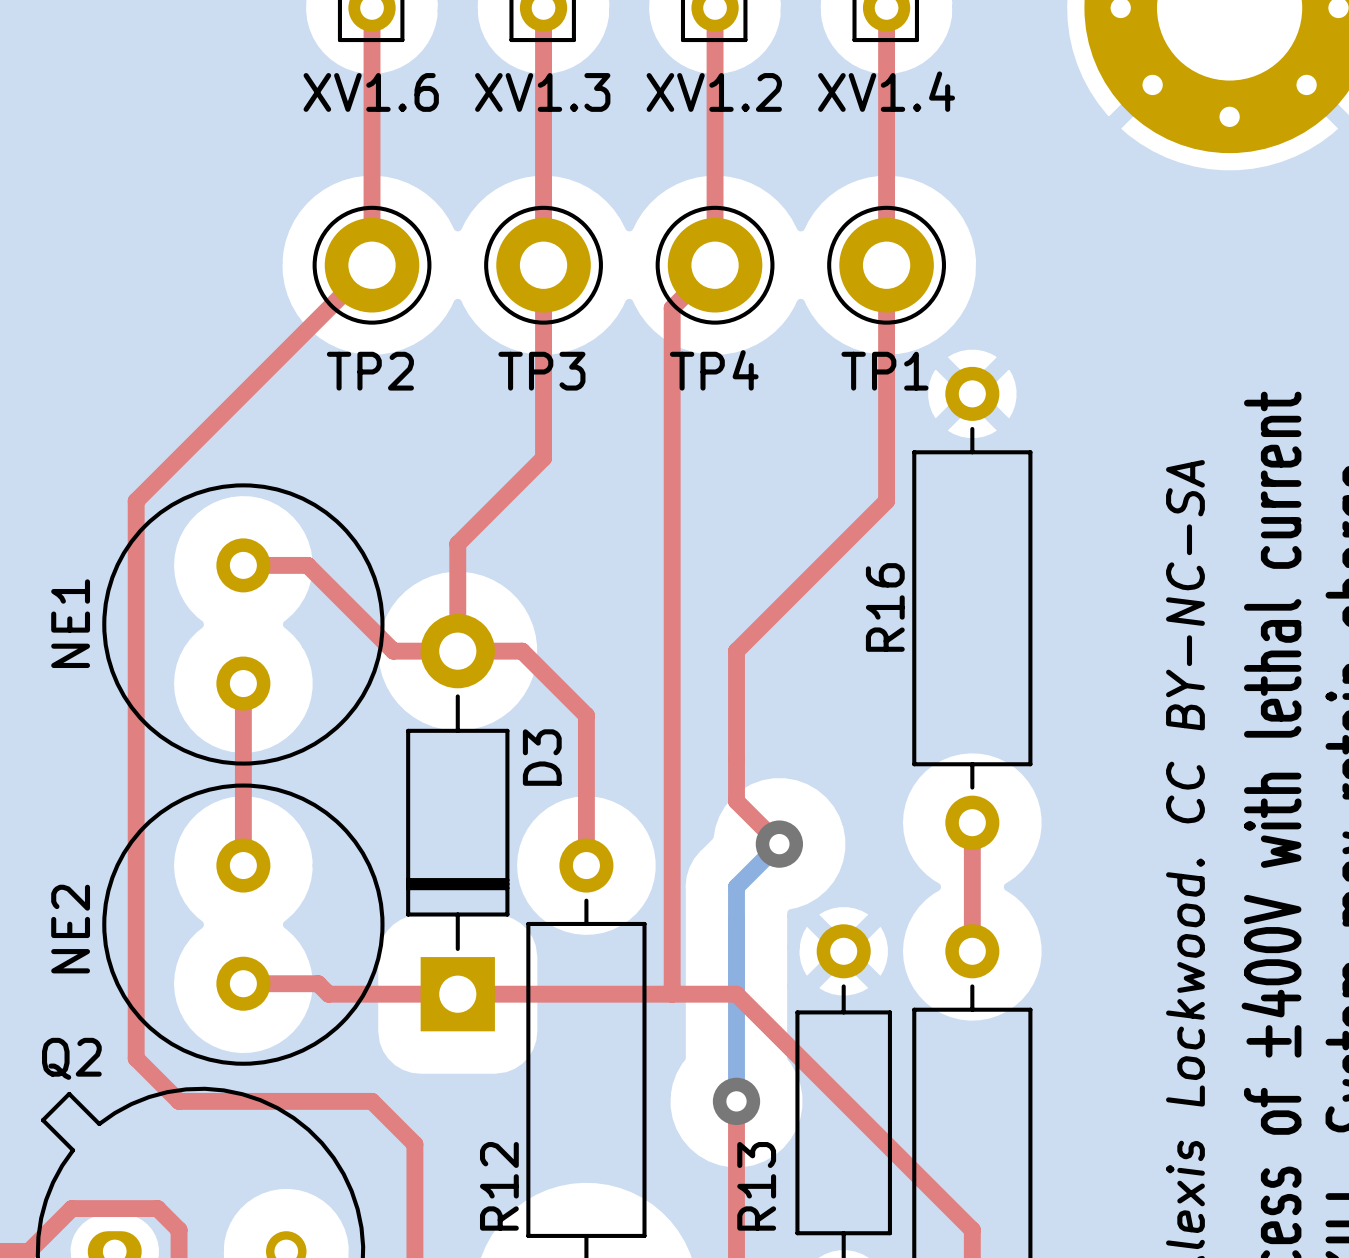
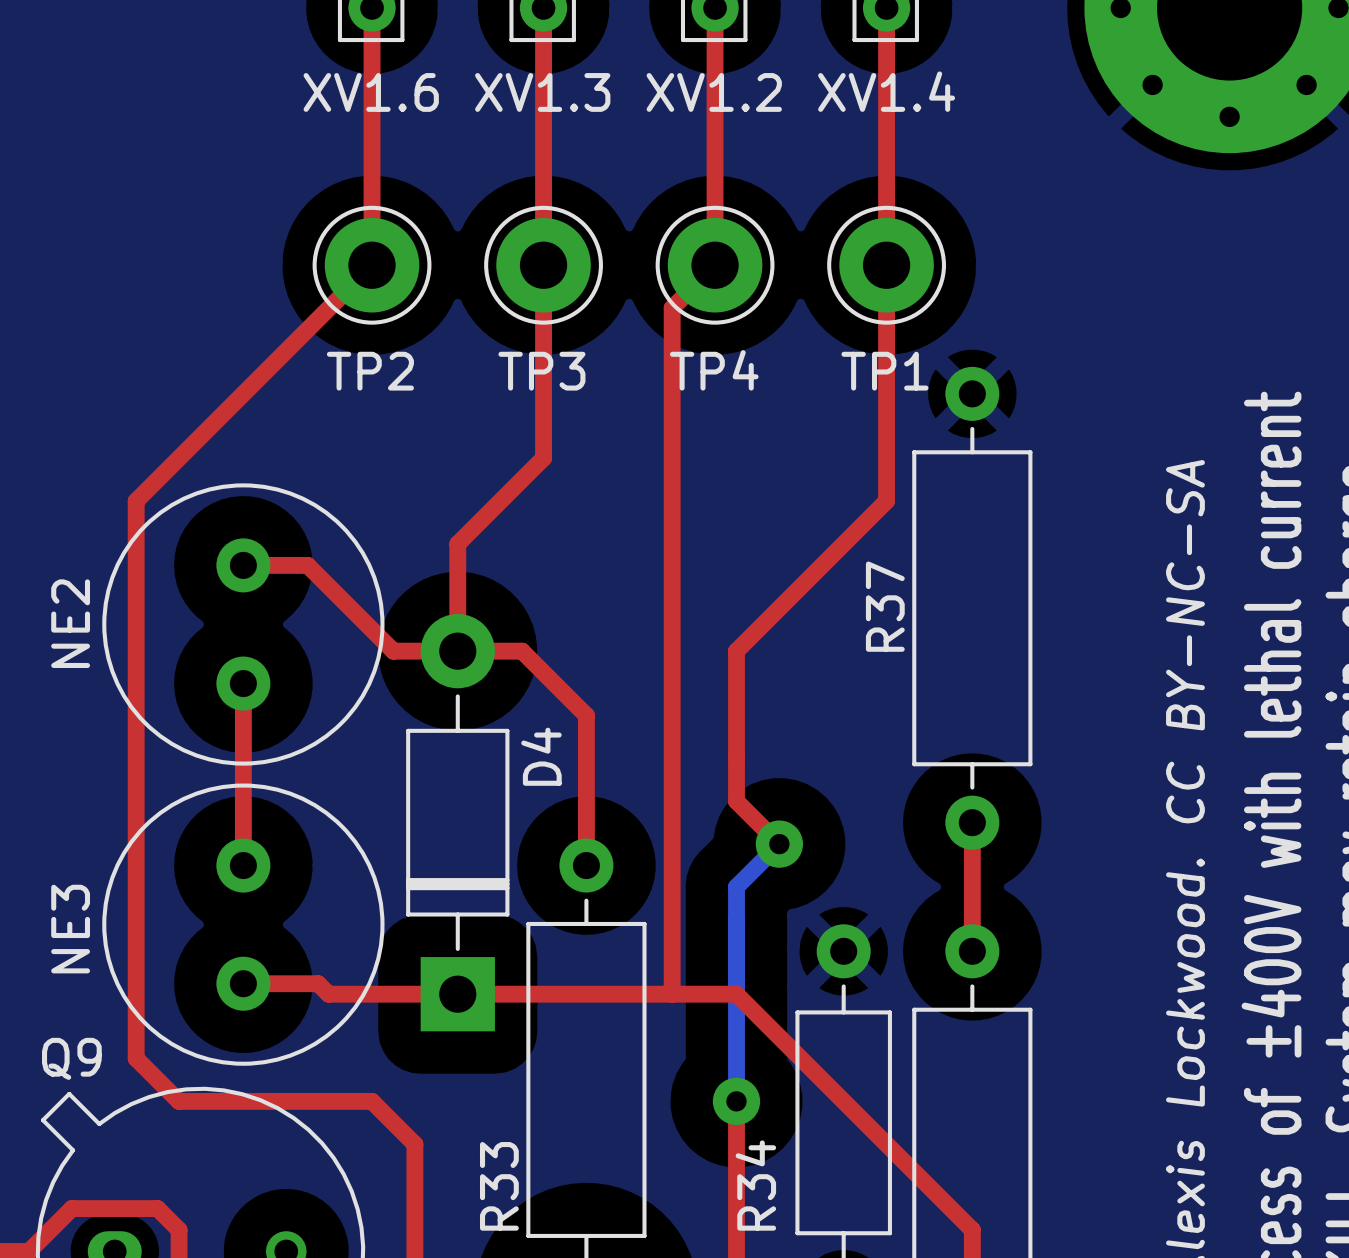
R16 name: R16 (885, 607) -> R37 (885, 606)
NE1 name: NE1 (70, 623) -> NE2 (70, 623)
D3 name: D3 (542, 757) -> D4 (541, 756)
NE2 name: NE2 (70, 929) -> NE3 (70, 929)
Q2 name: Q2 (71, 1058) -> Q9 (71, 1058)
R12 name: R12 (499, 1186) -> R33 (499, 1186)
R13 name: R13 (756, 1186) -> R34 (755, 1185)

